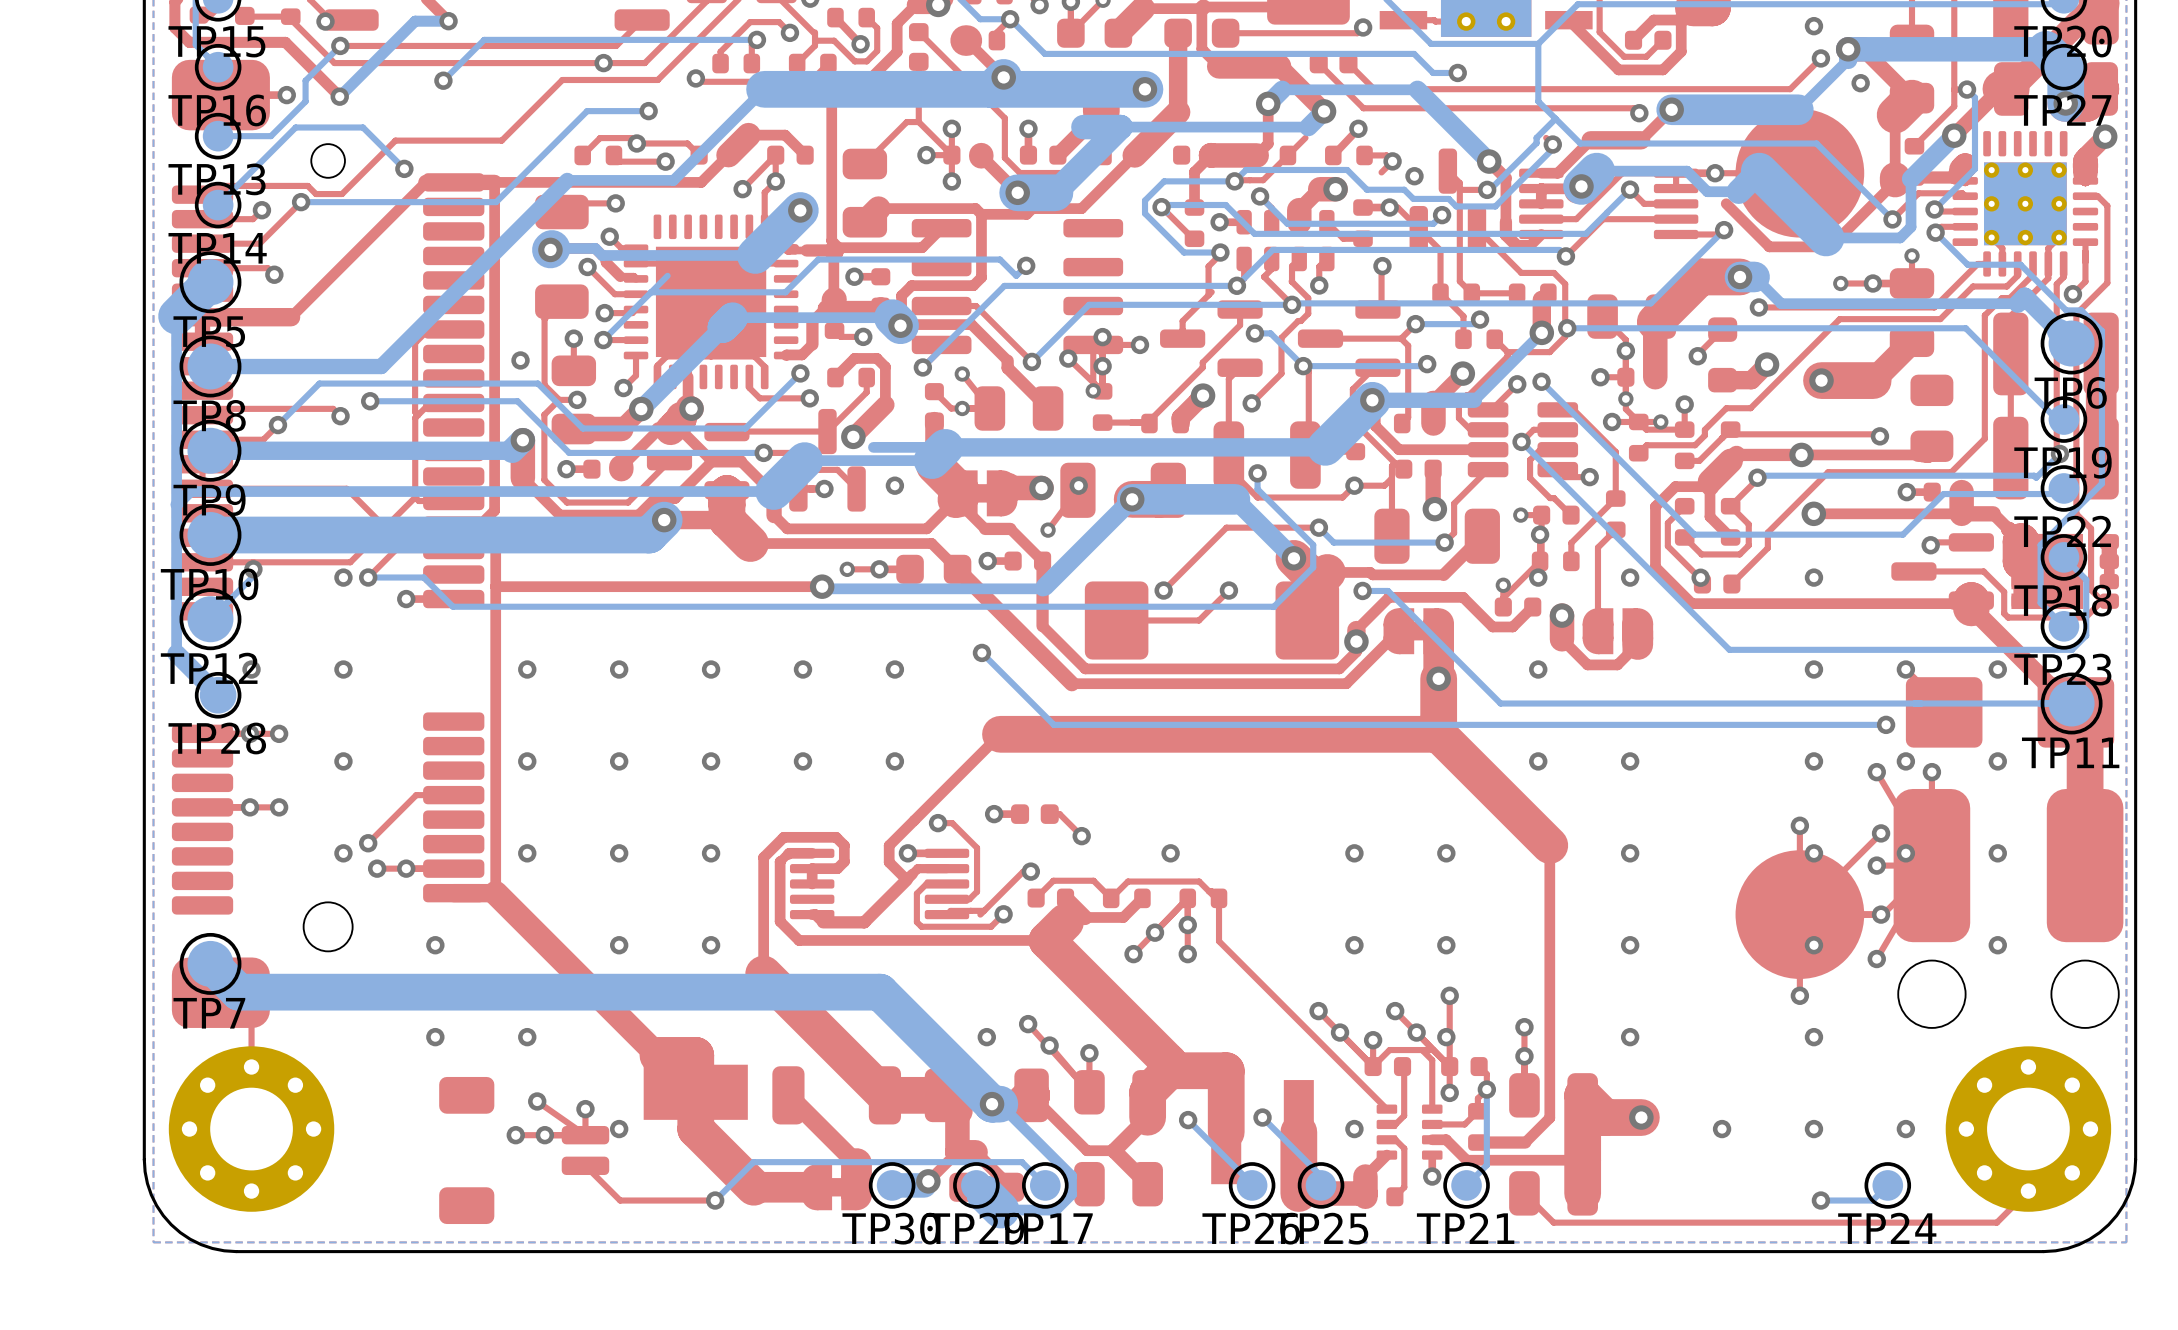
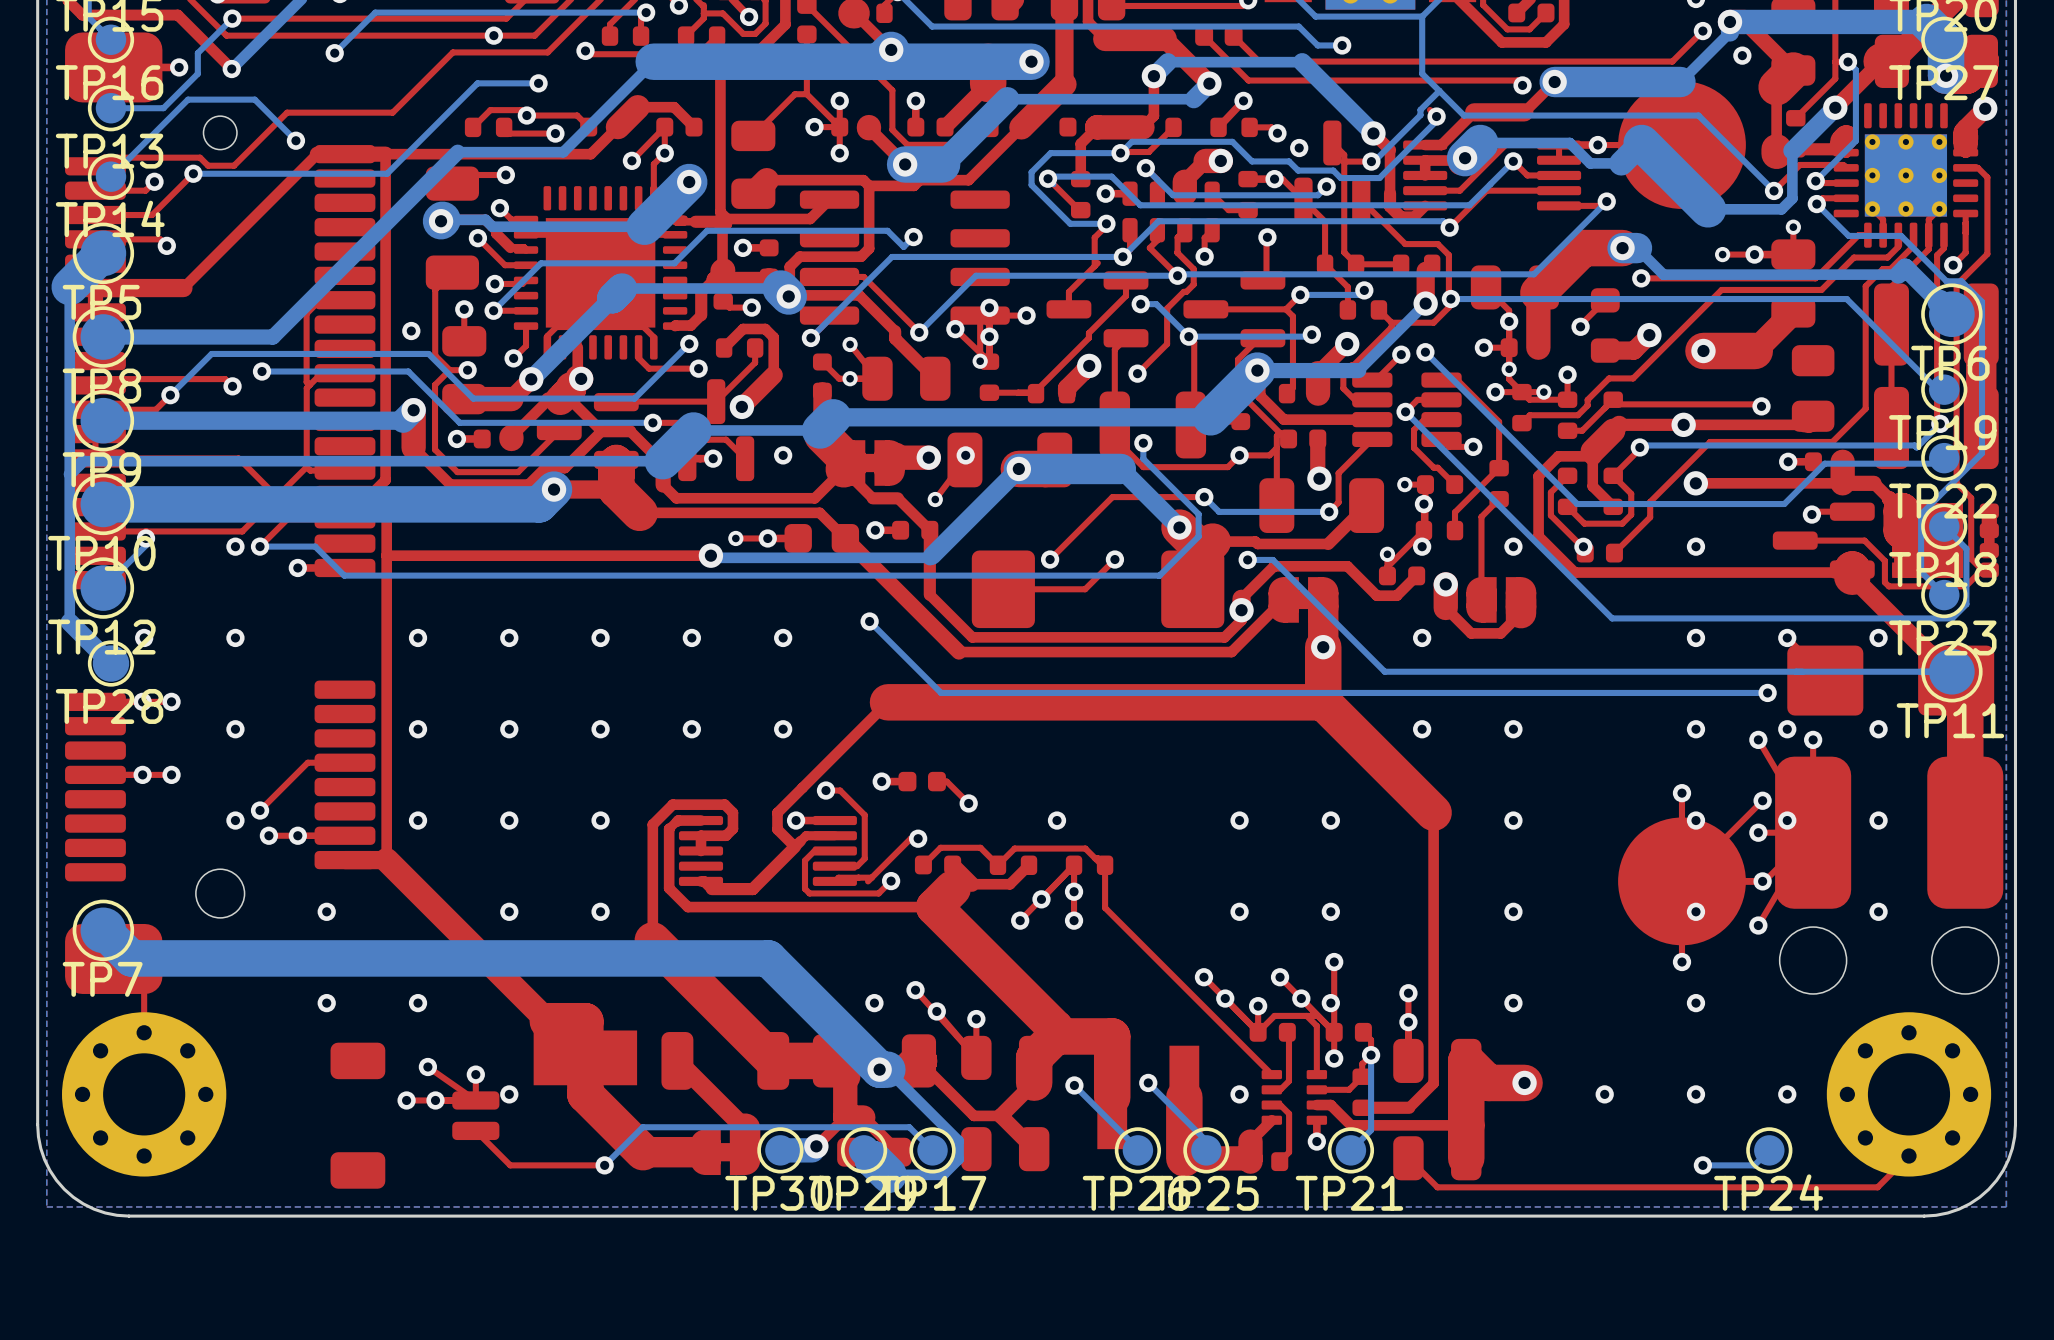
bottom track: (1120, 127) (1083, 127) -> none
top track: (1305, 137) (1287, 155) -> none
top track: (1392, 161) (1381, 172) -> none
top track: (1895, 182) (1830, 246) (1769, 246) (1726, 203) -> none
bottom track: (667, 275) (651, 292) -> none
bottom track: (945, 447) (873, 447) -> none

